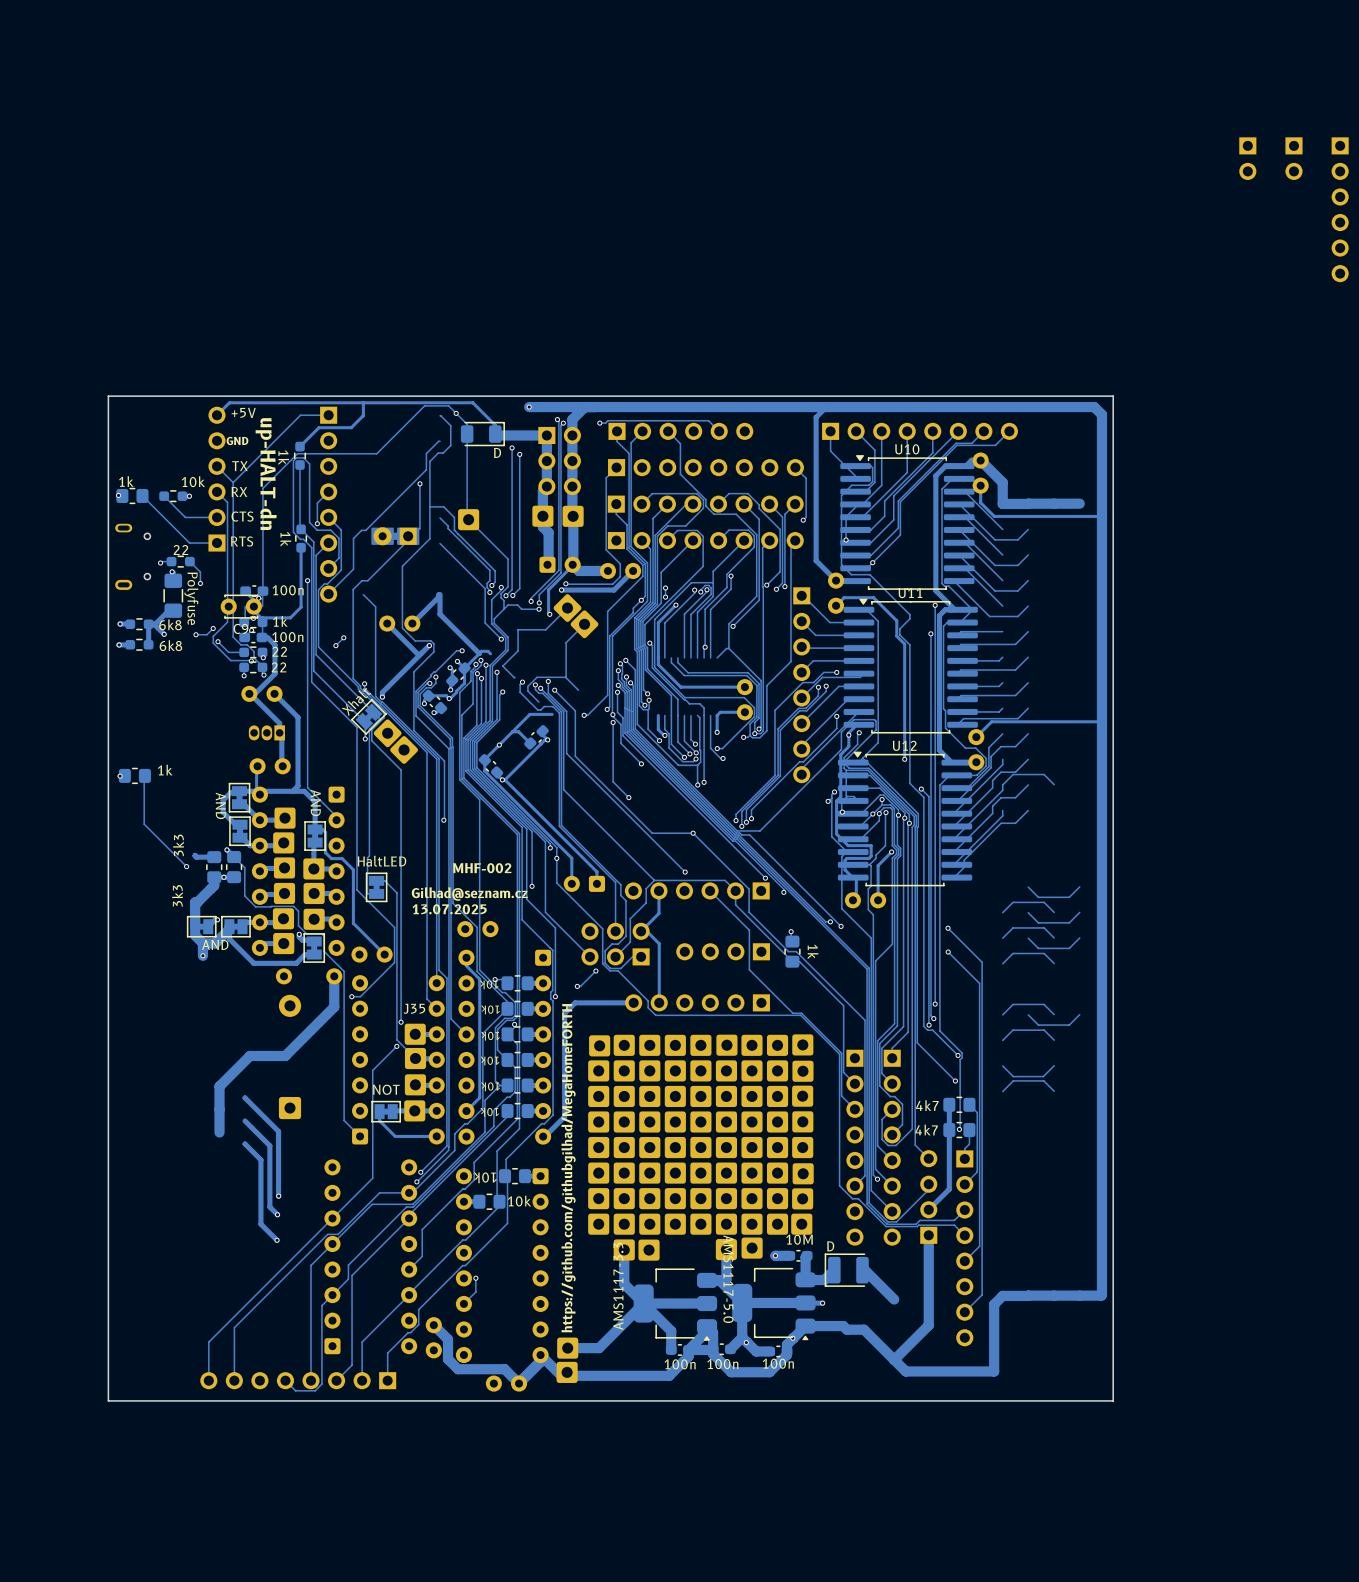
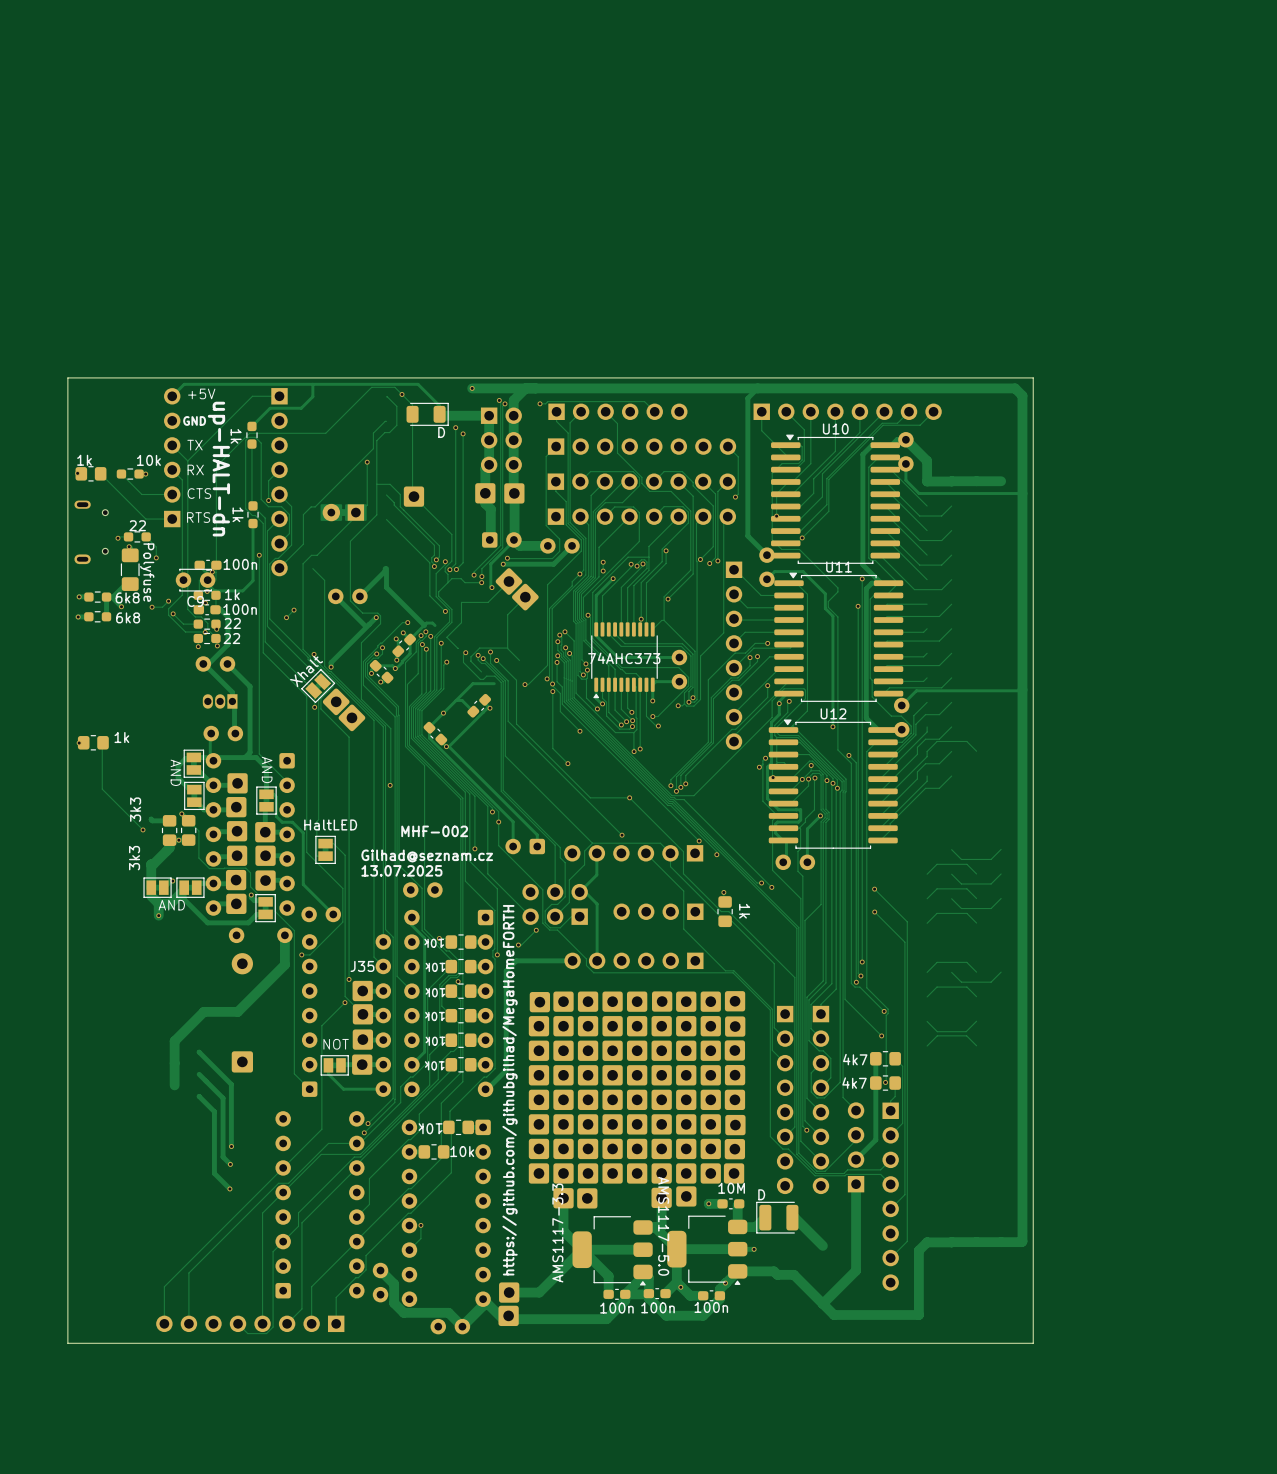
part: (1247, 158) -> none
part: (1293, 158) -> none
part: (1340, 209) -> none
part: none -> 74AHC373 (624, 660)

